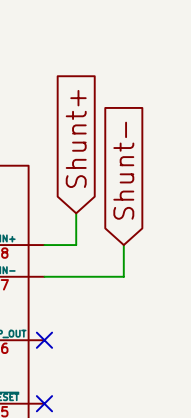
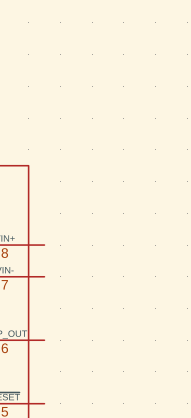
global label: Shunt+ (76, 138) -> none
global label: Shunt- (123, 170) -> none
wire: (76, 213) (76, 245) (44, 245) -> none
wire: (123, 245) (123, 276) (44, 276) -> none
no-connect mark: (44, 340) -> none
no-connect mark: (44, 403) -> none

